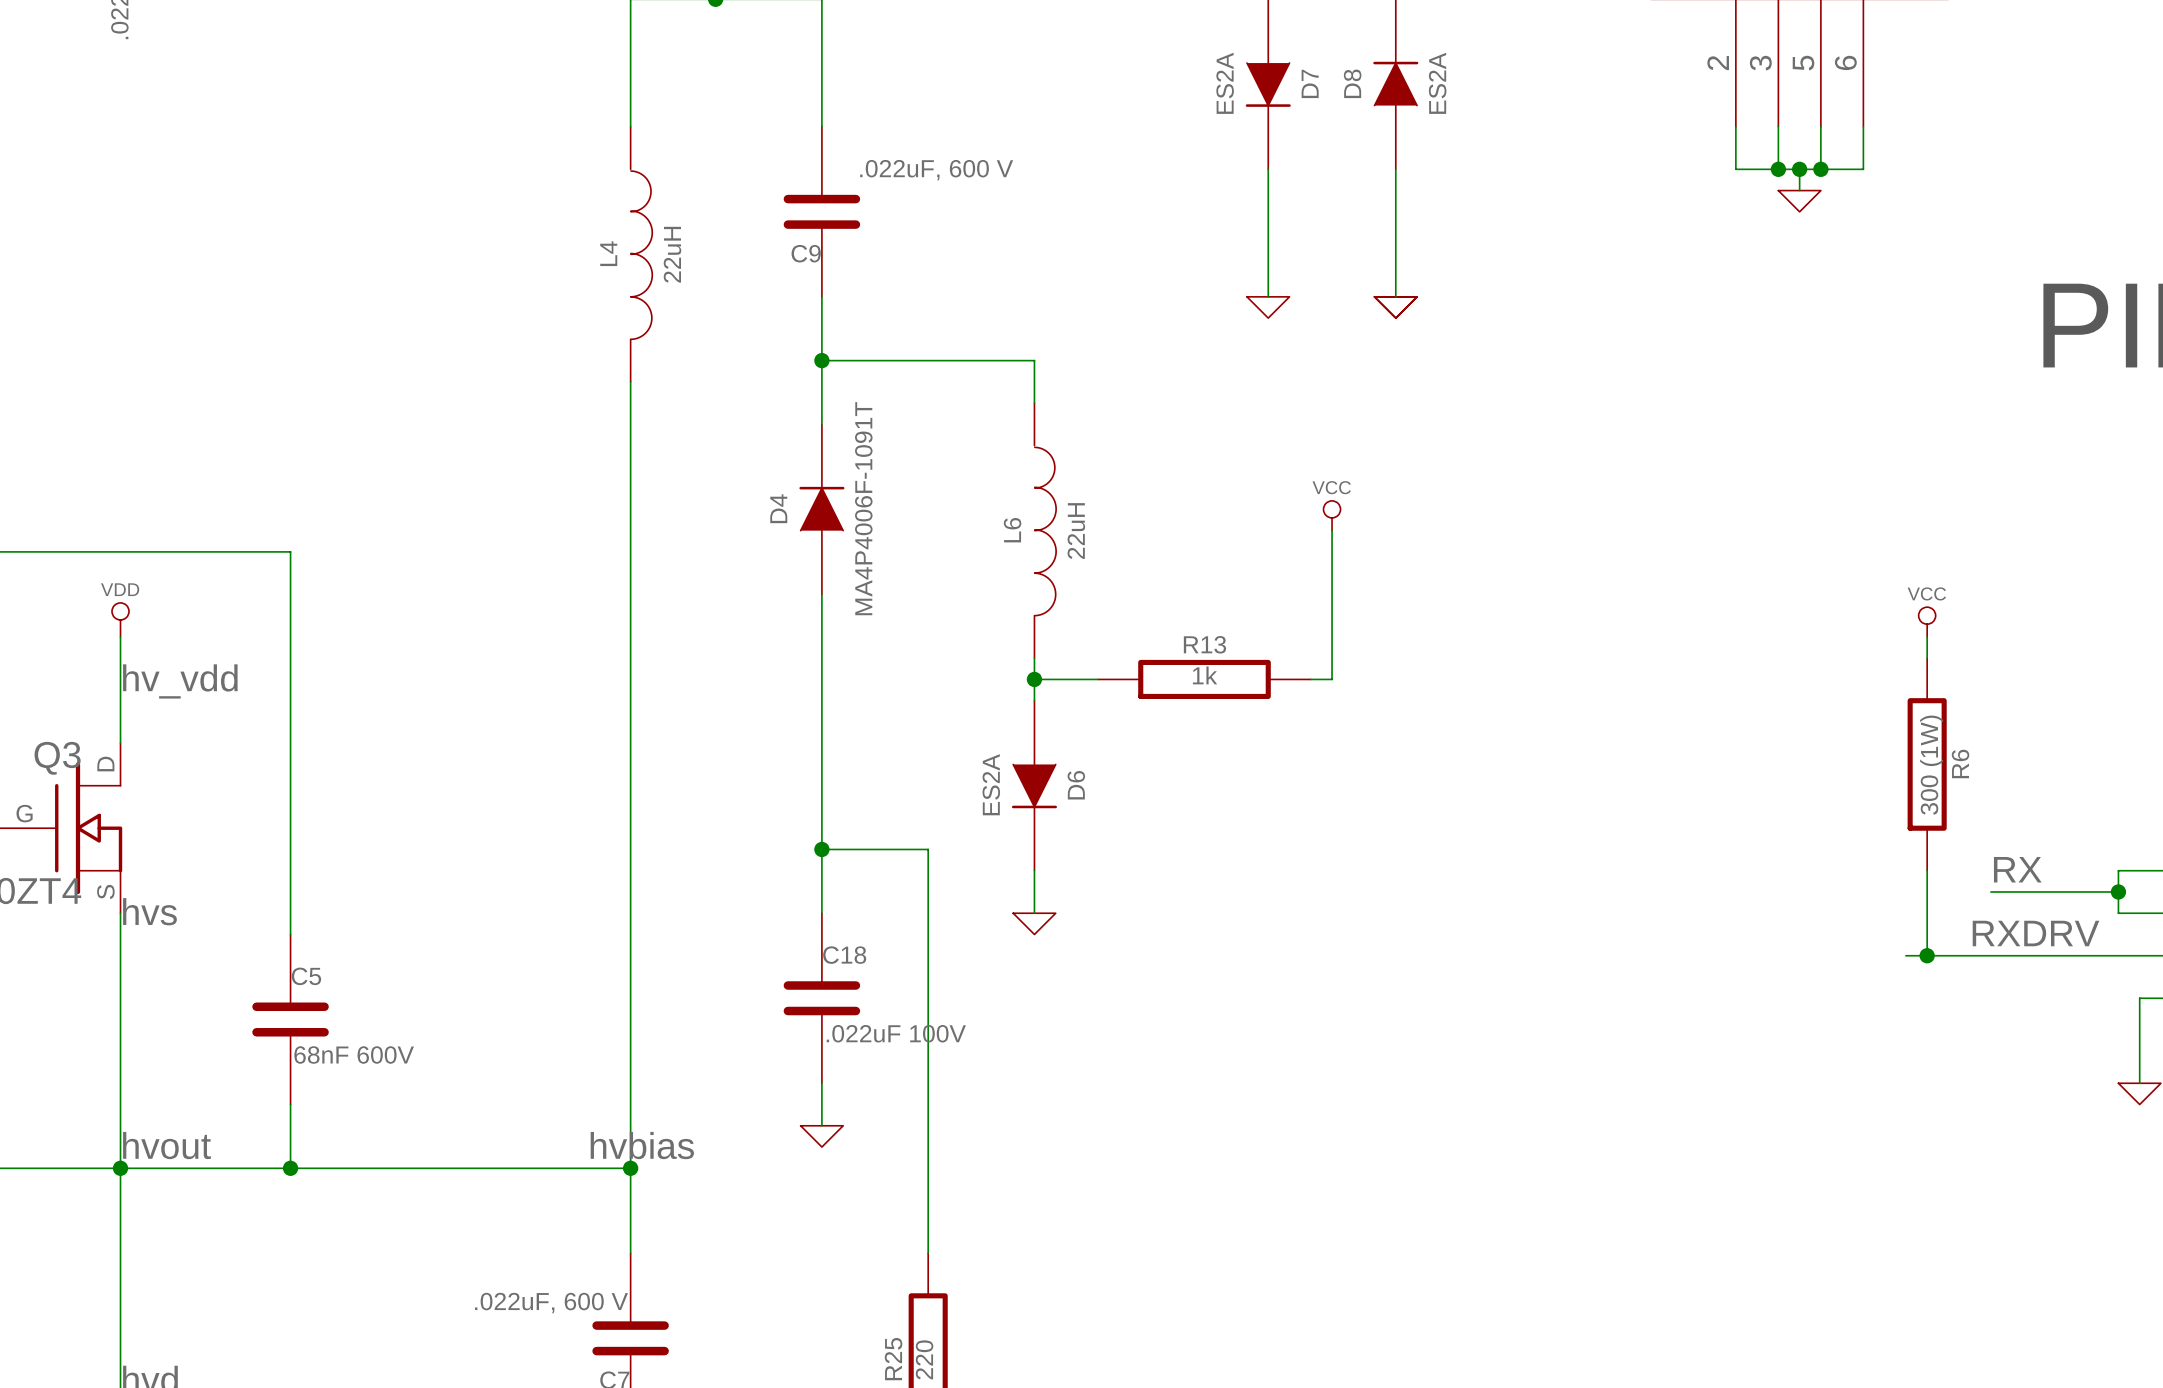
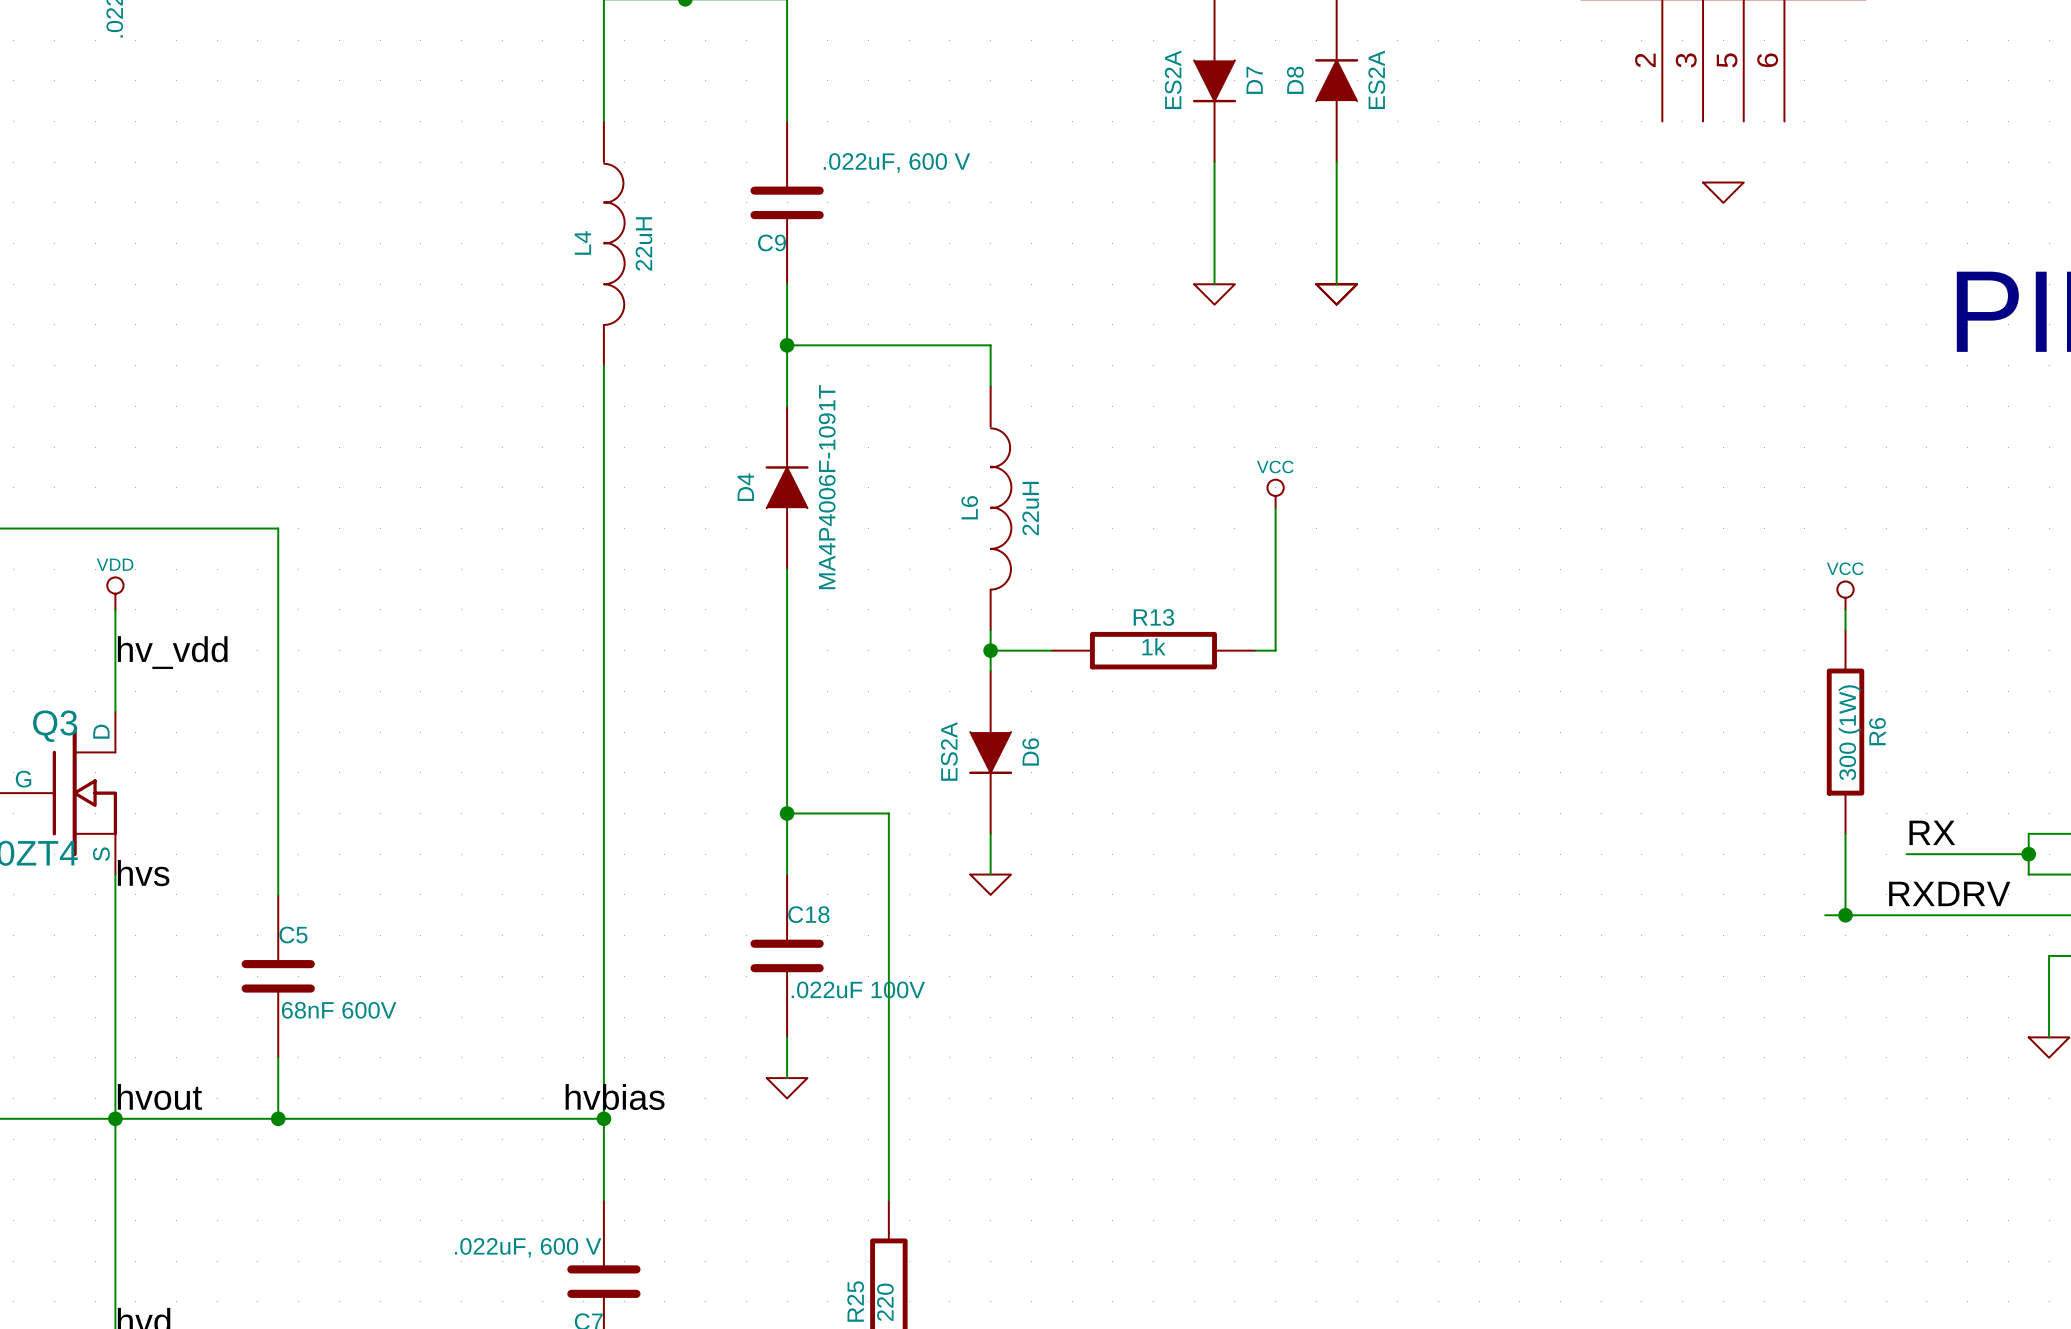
wire: (1735, 126) (1735, 169) (1863, 169) (1863, 126) -> none
wire: (1778, 126) (1778, 169) -> none
wire: (1820, 126) (1820, 169) -> none
junction: (1778, 169) -> none
wire: (1799, 169) (1799, 190) -> none
junction: (1799, 169) -> none
junction: (1820, 169) -> none

